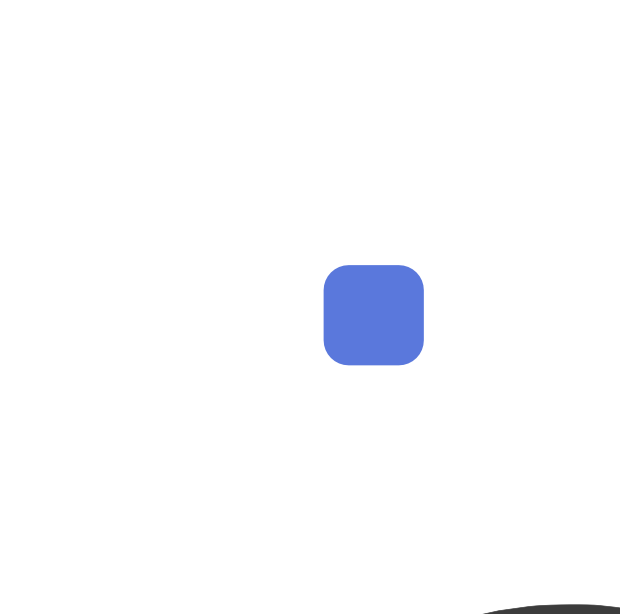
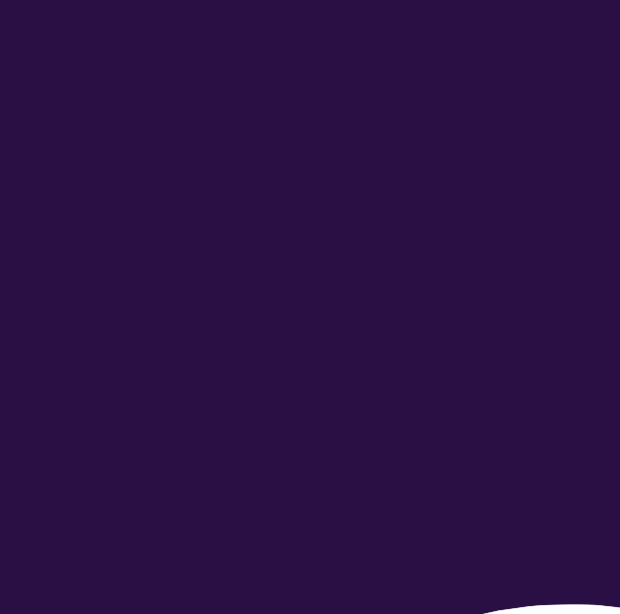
part: (373, 315) -> none

